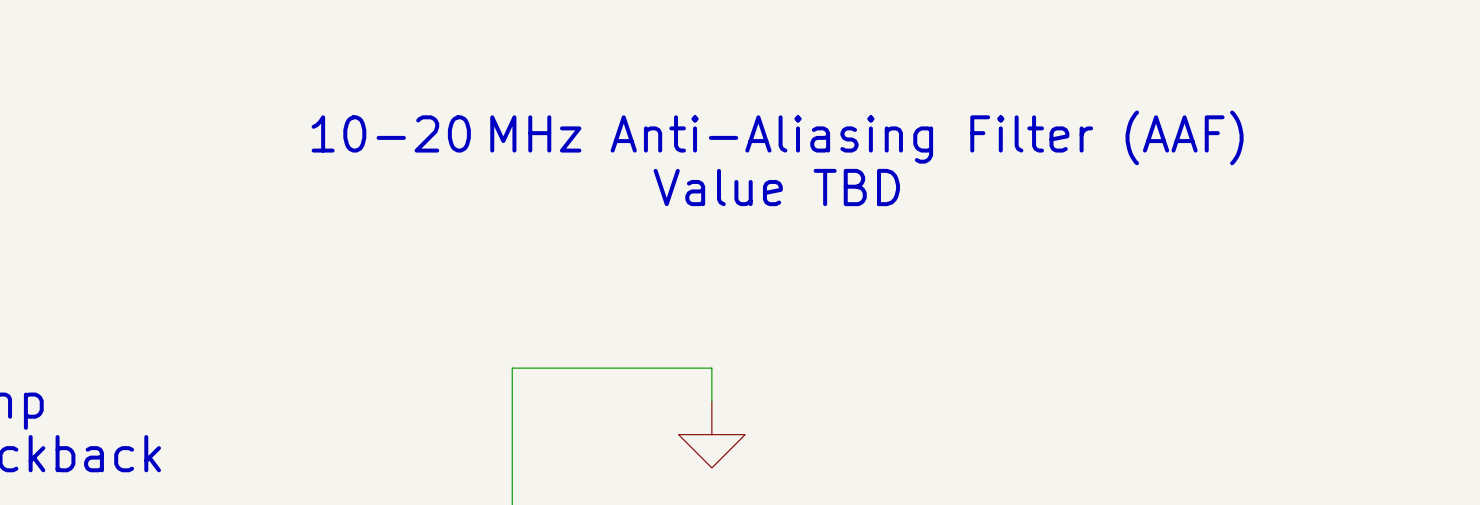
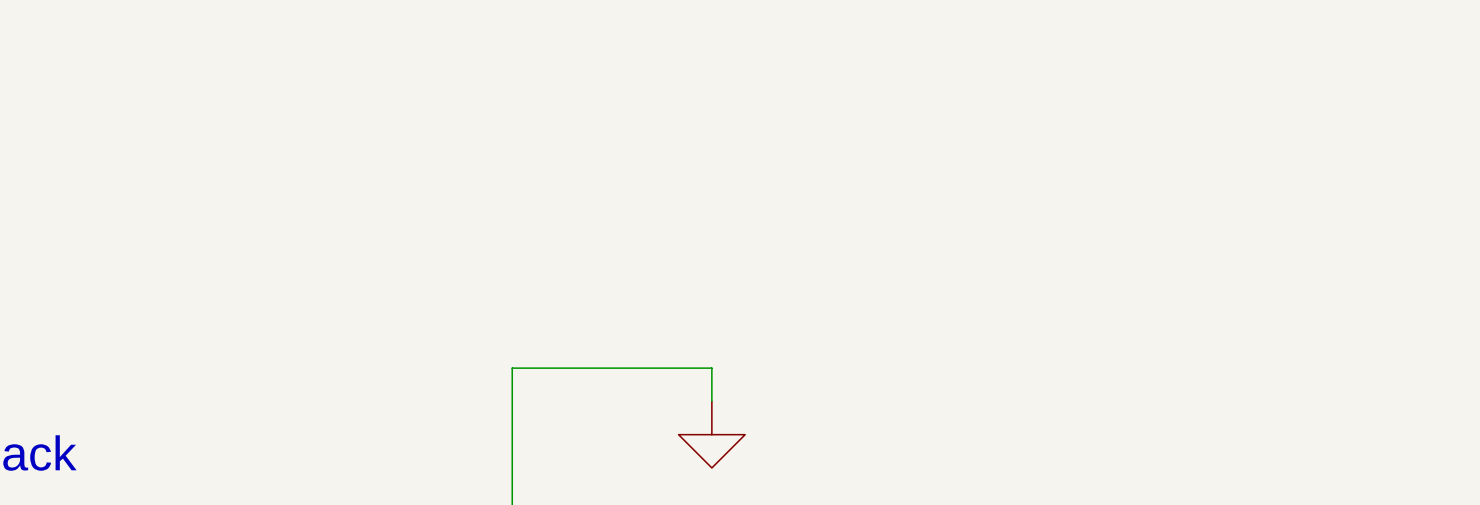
text: 10-20 MHz Anti-Aliasing Filter (AAF) (777, 137) -> none
text: Value TBD (776, 187) -> none

